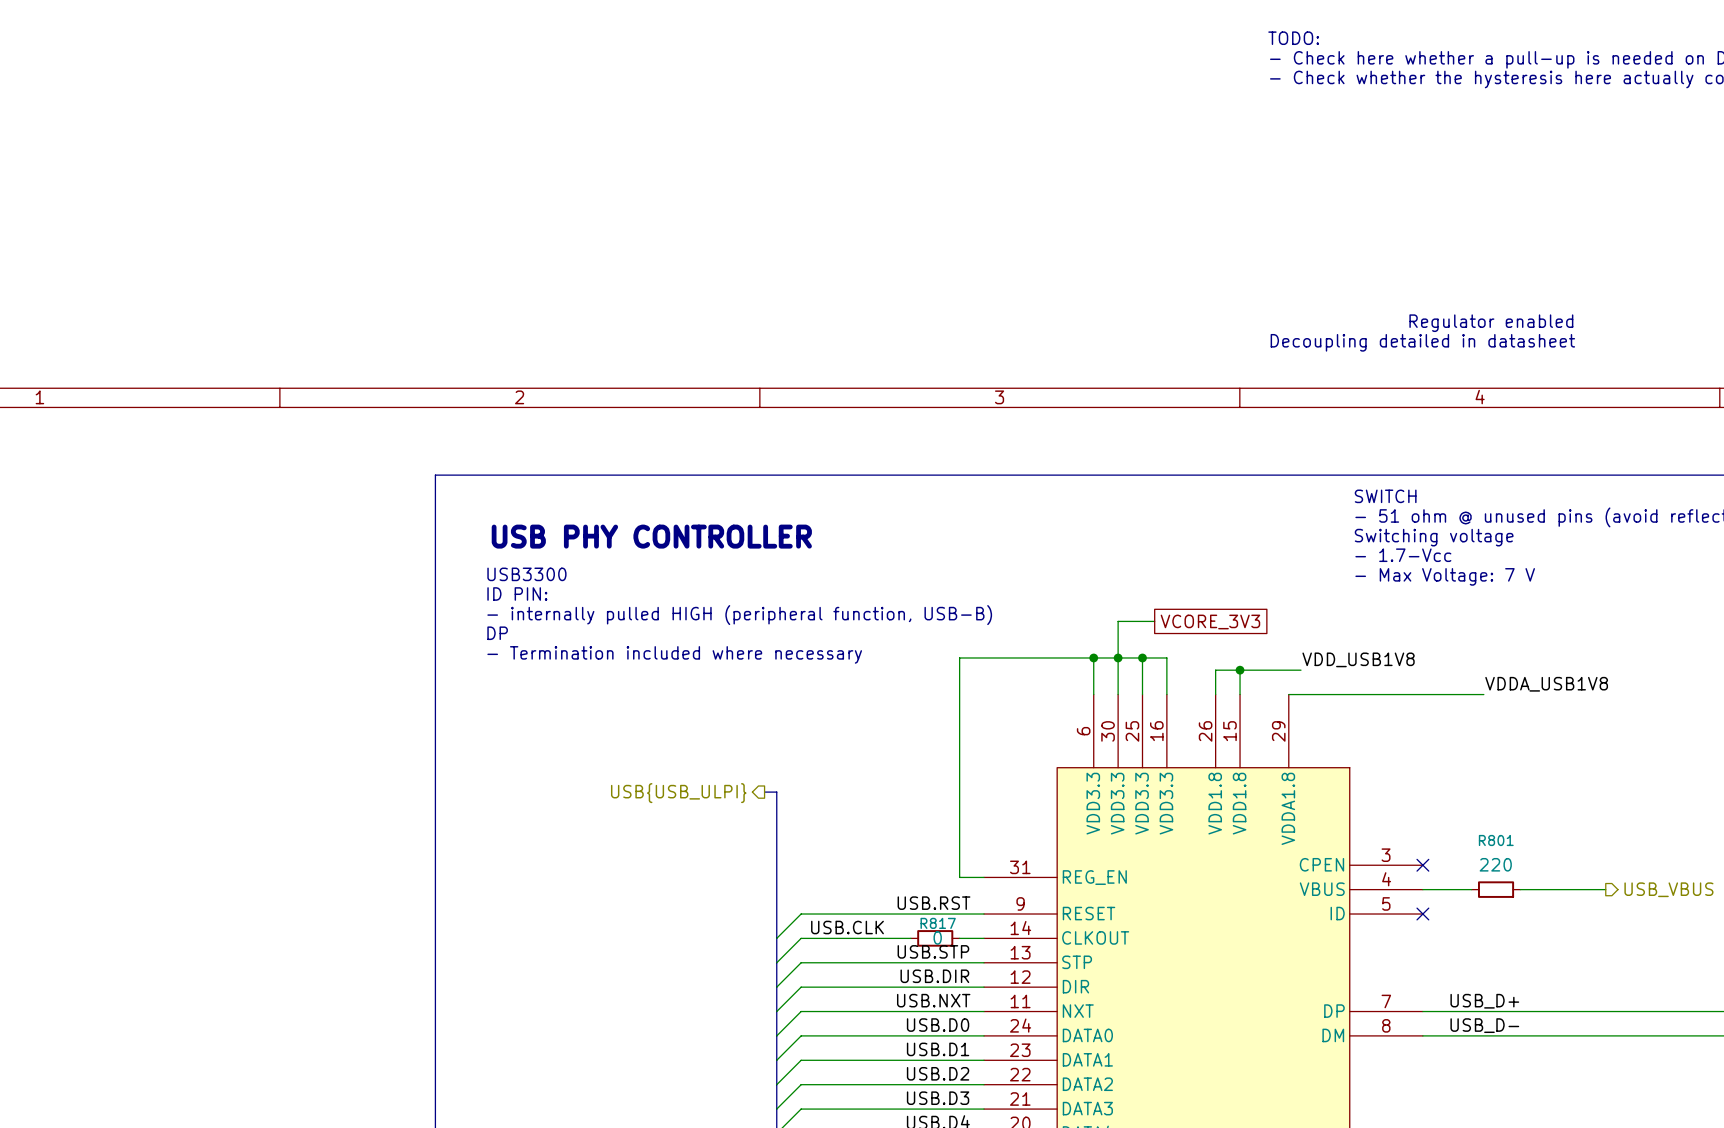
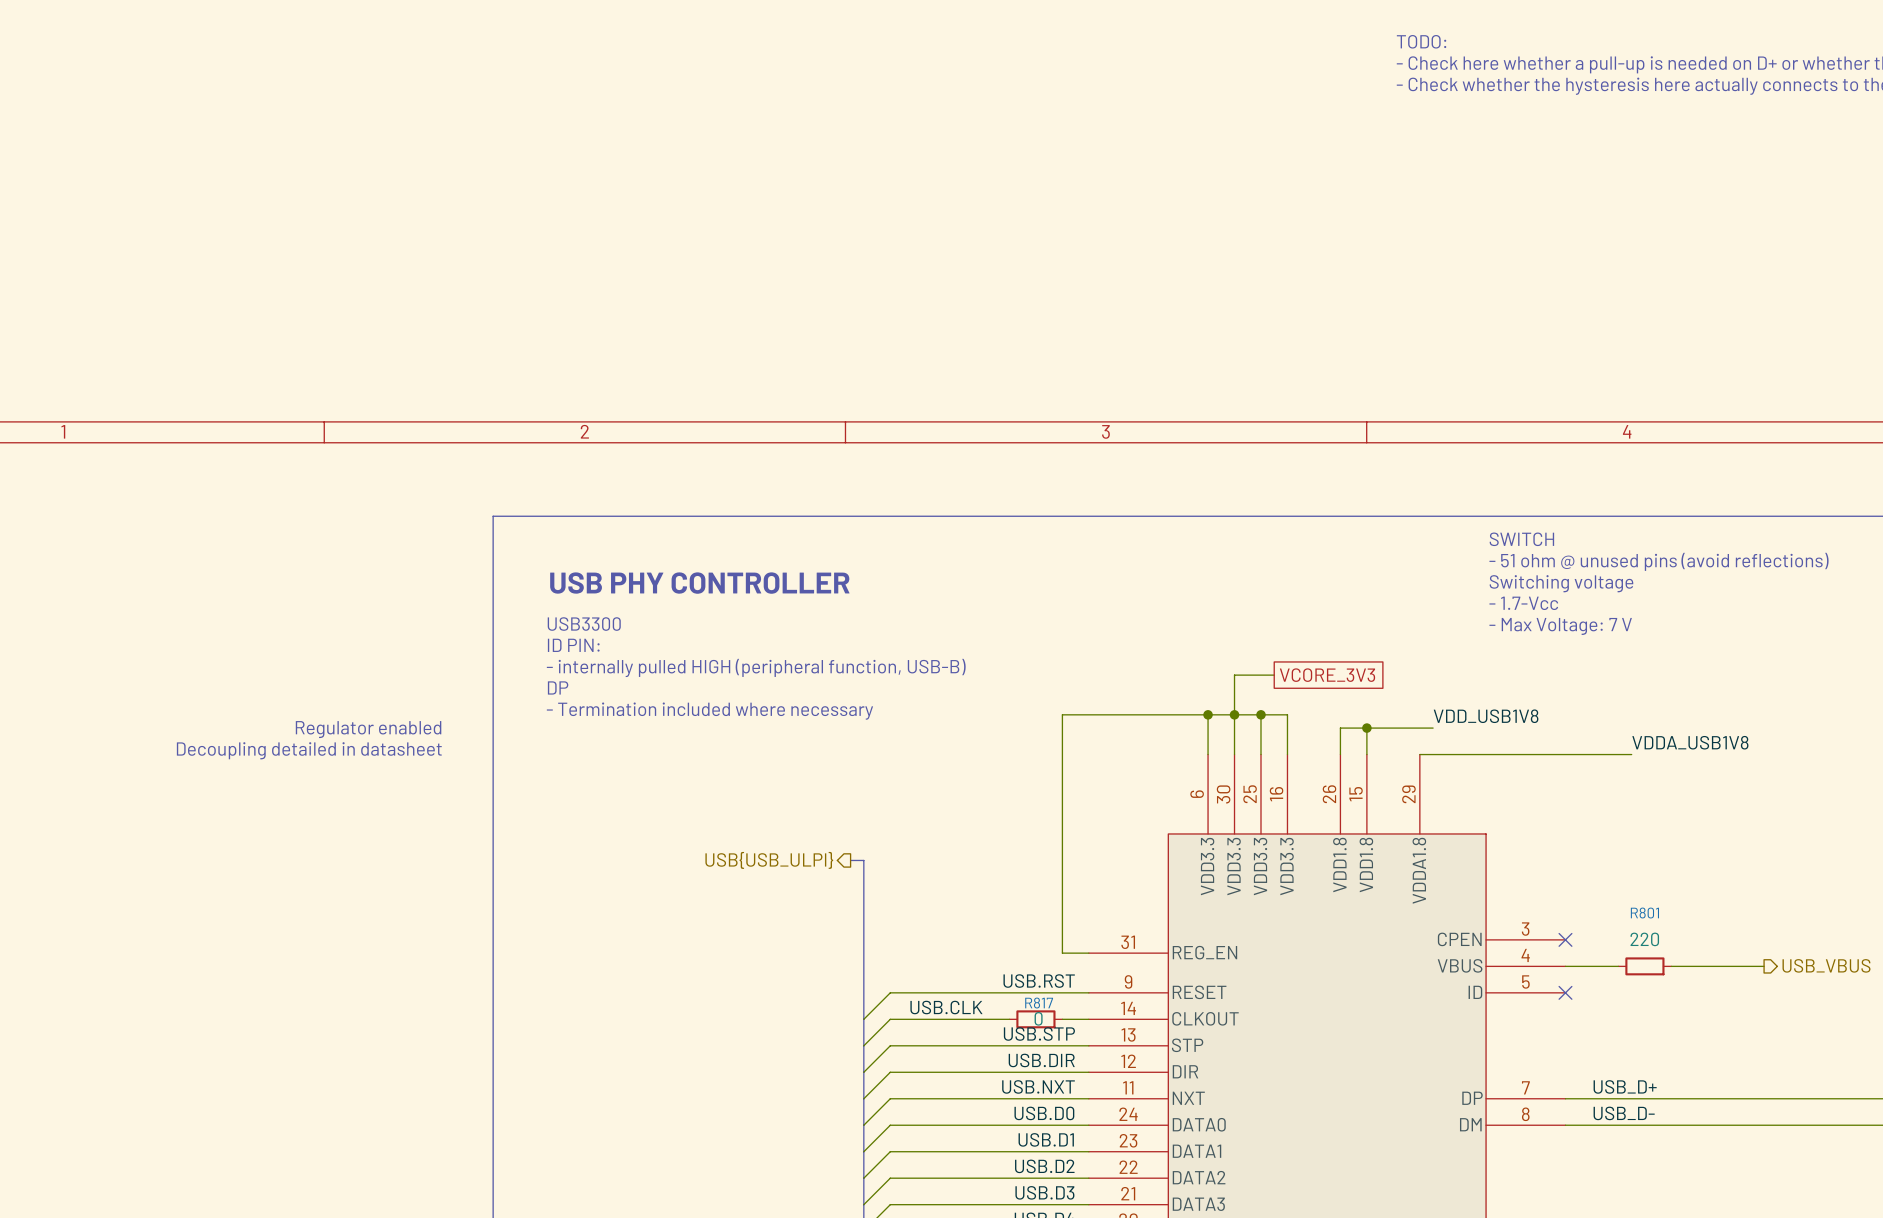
text: Regulator enabled (1491, 323) -> none
text: Decoupling detailed in datasheet (1422, 342) -> none
text: none -> Regulator enabled (368, 729)
text: none -> Decoupling detailed in datasheet (309, 750)

